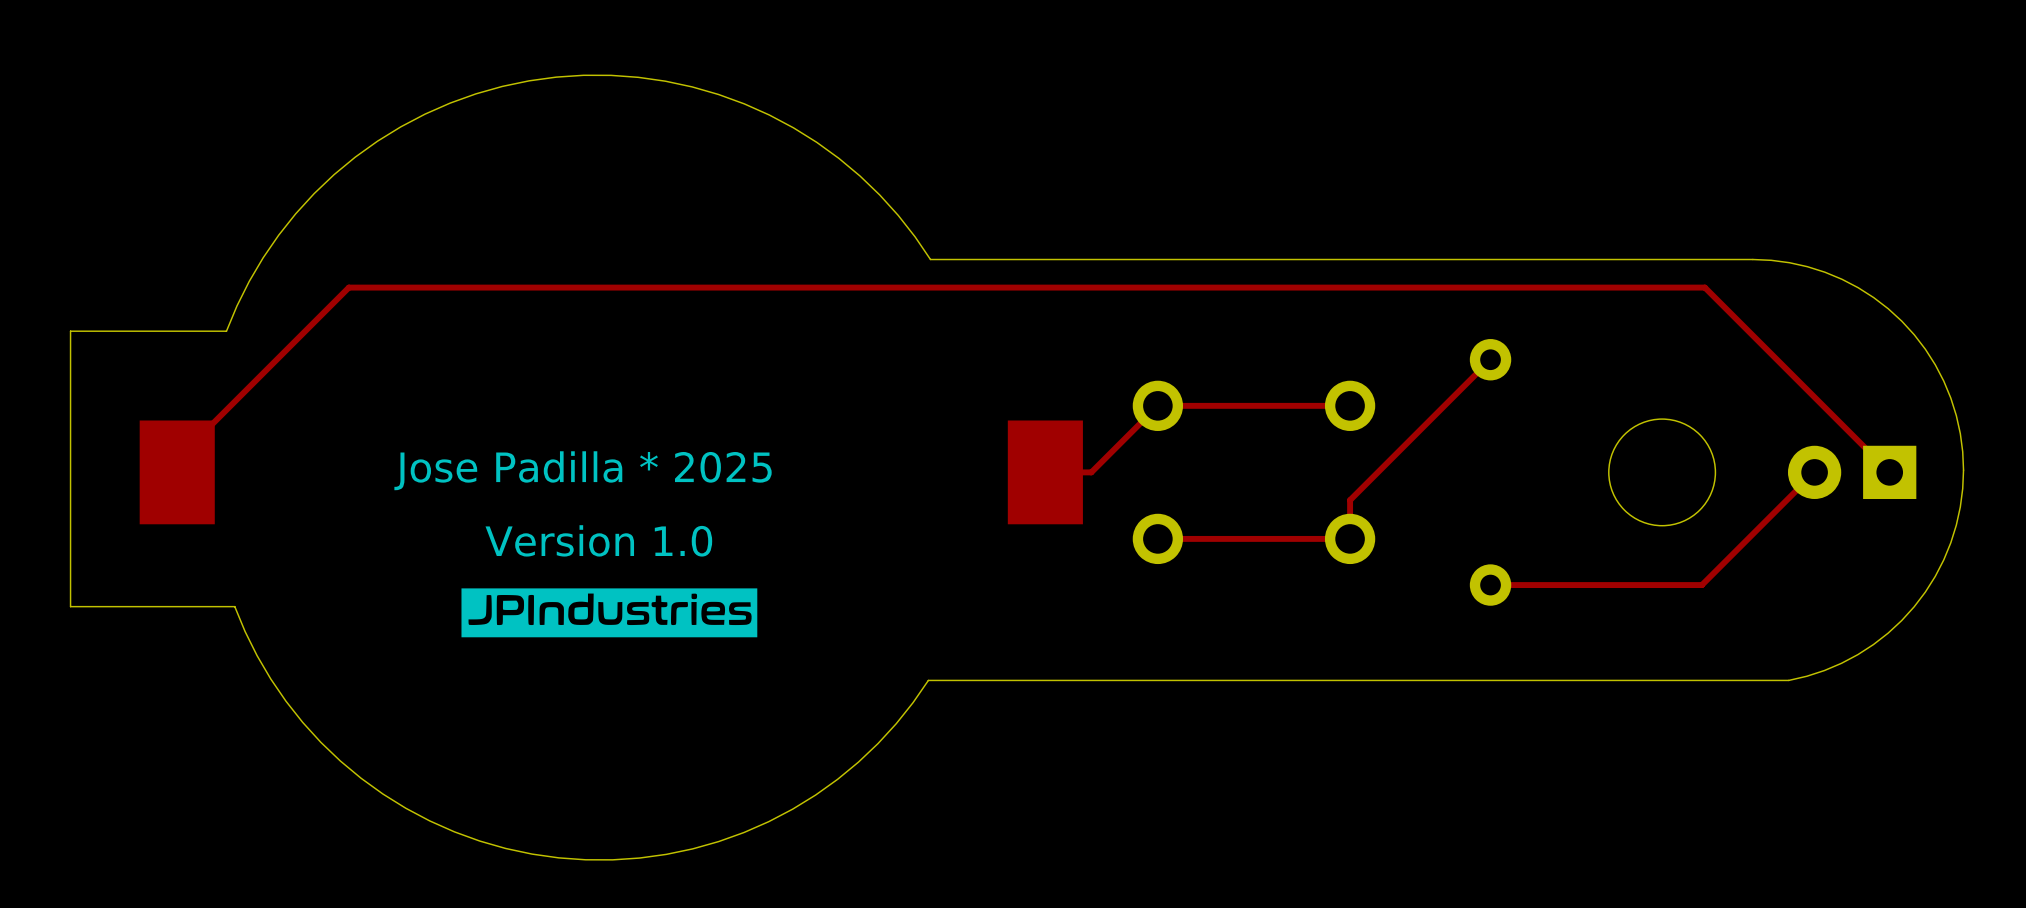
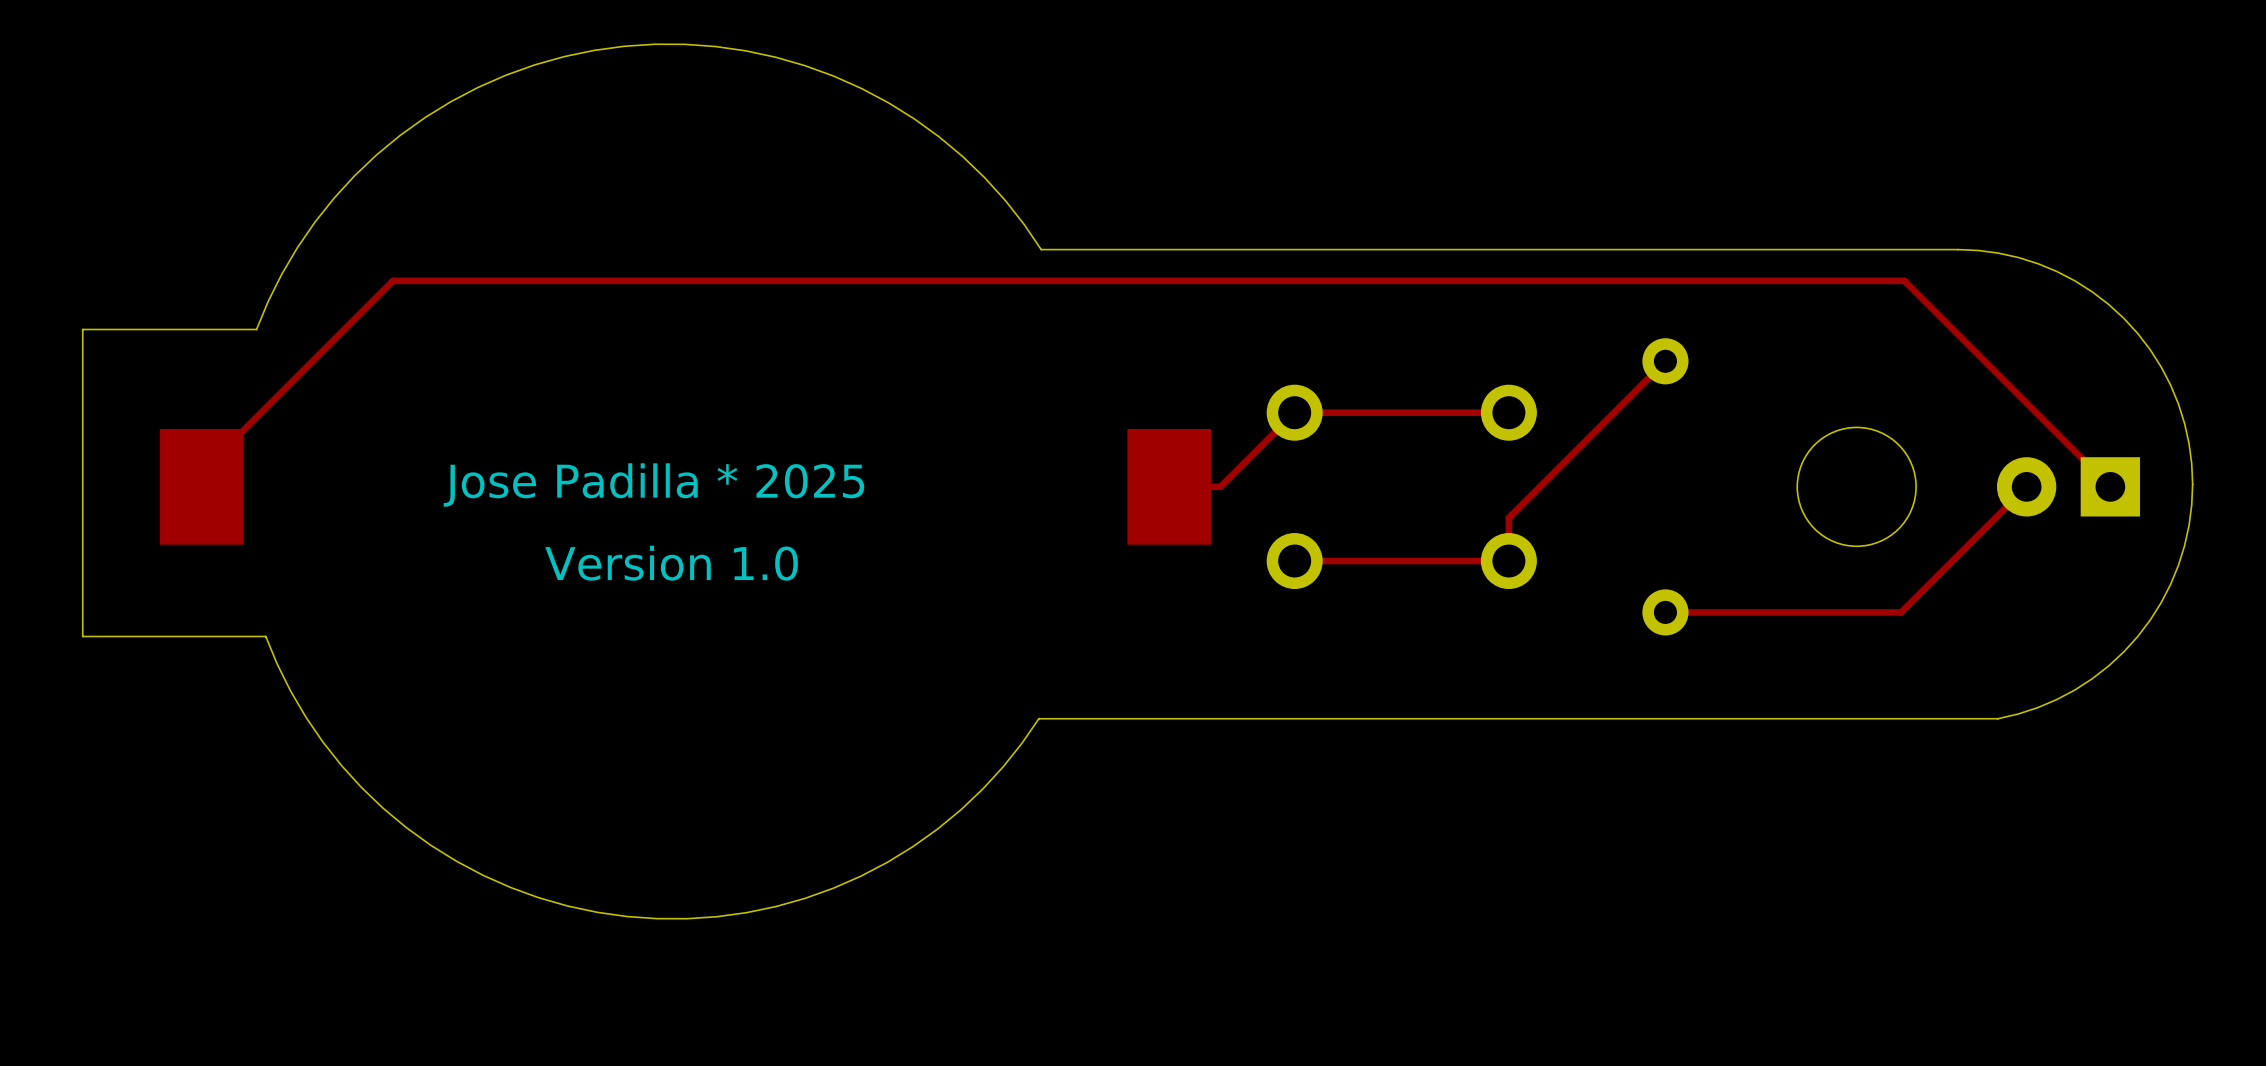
drawing: [461, 588, 758, 638] -> none

